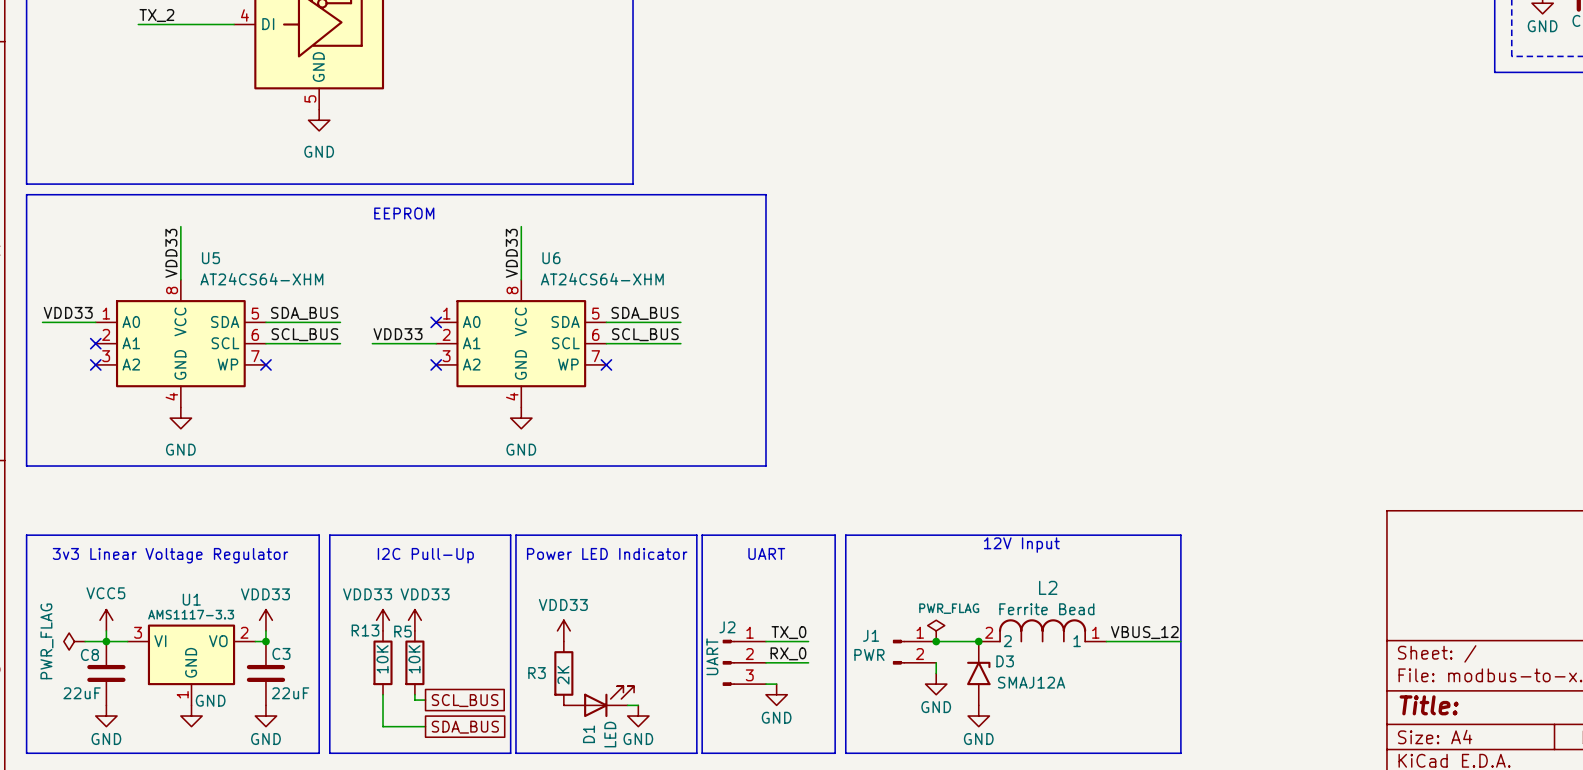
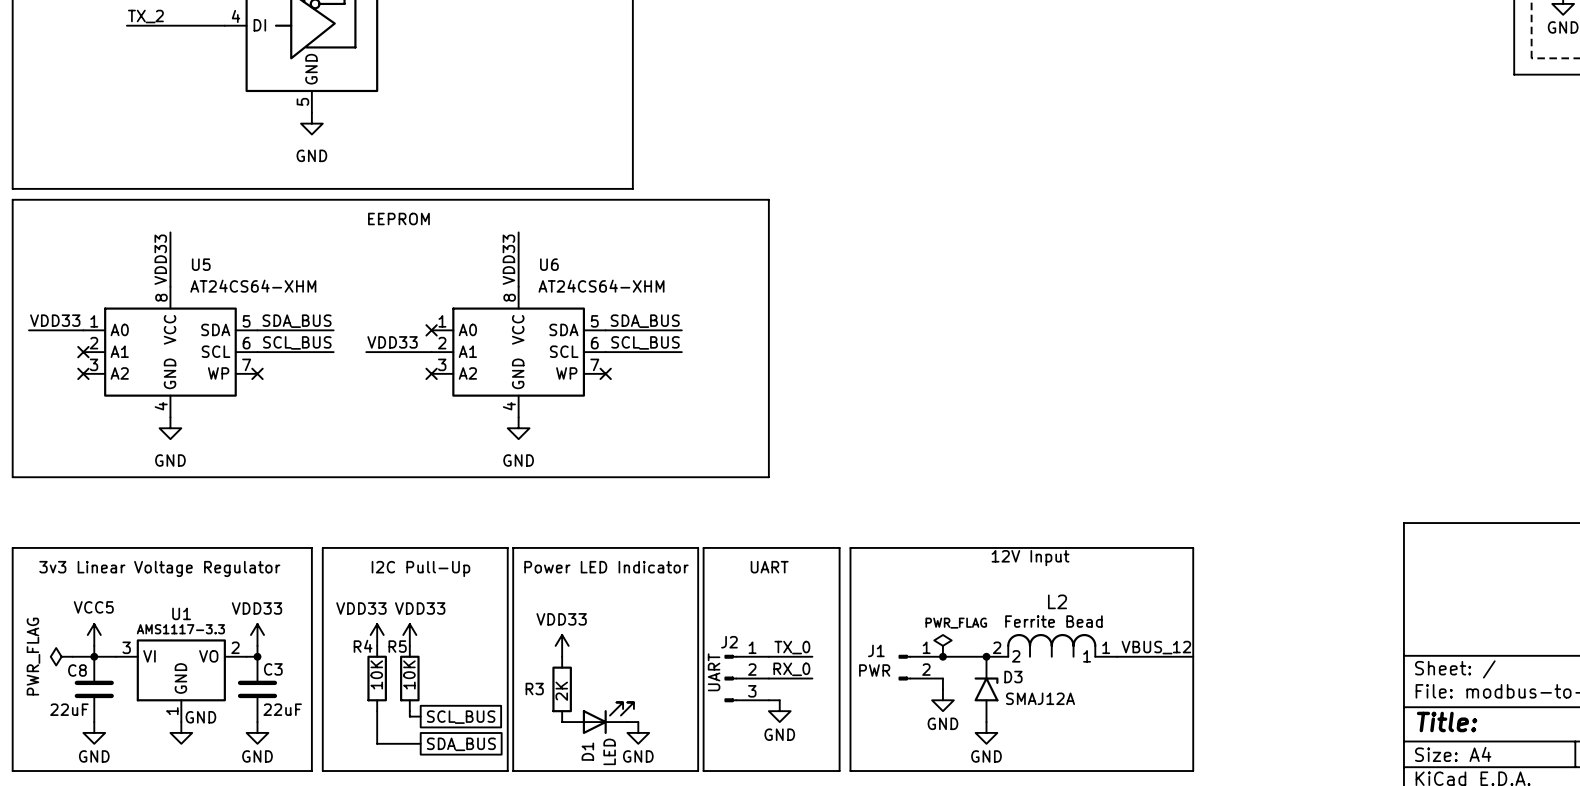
L2 text: none -> Ferrite Bead (1053, 621)
L2 text: Ferrite Bead (1046, 609) -> none
R13 name: R13 (365, 630) -> R4 (363, 646)

